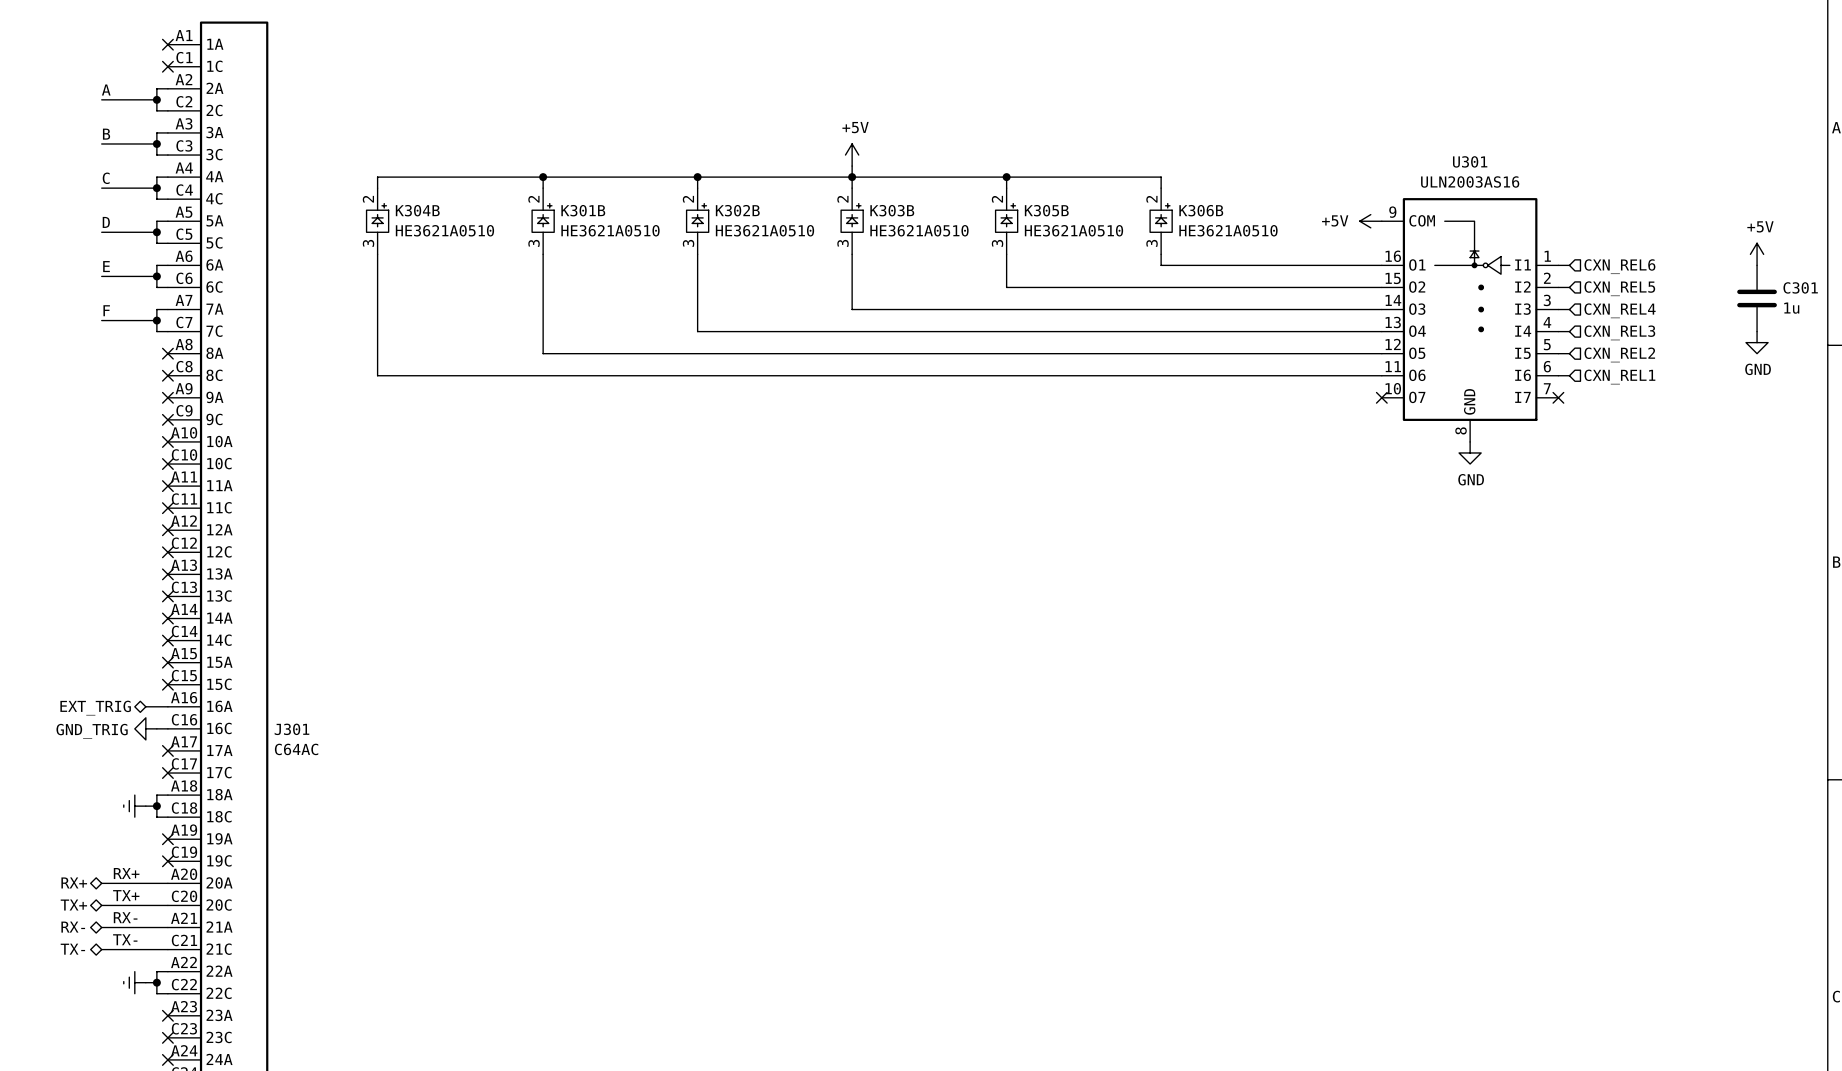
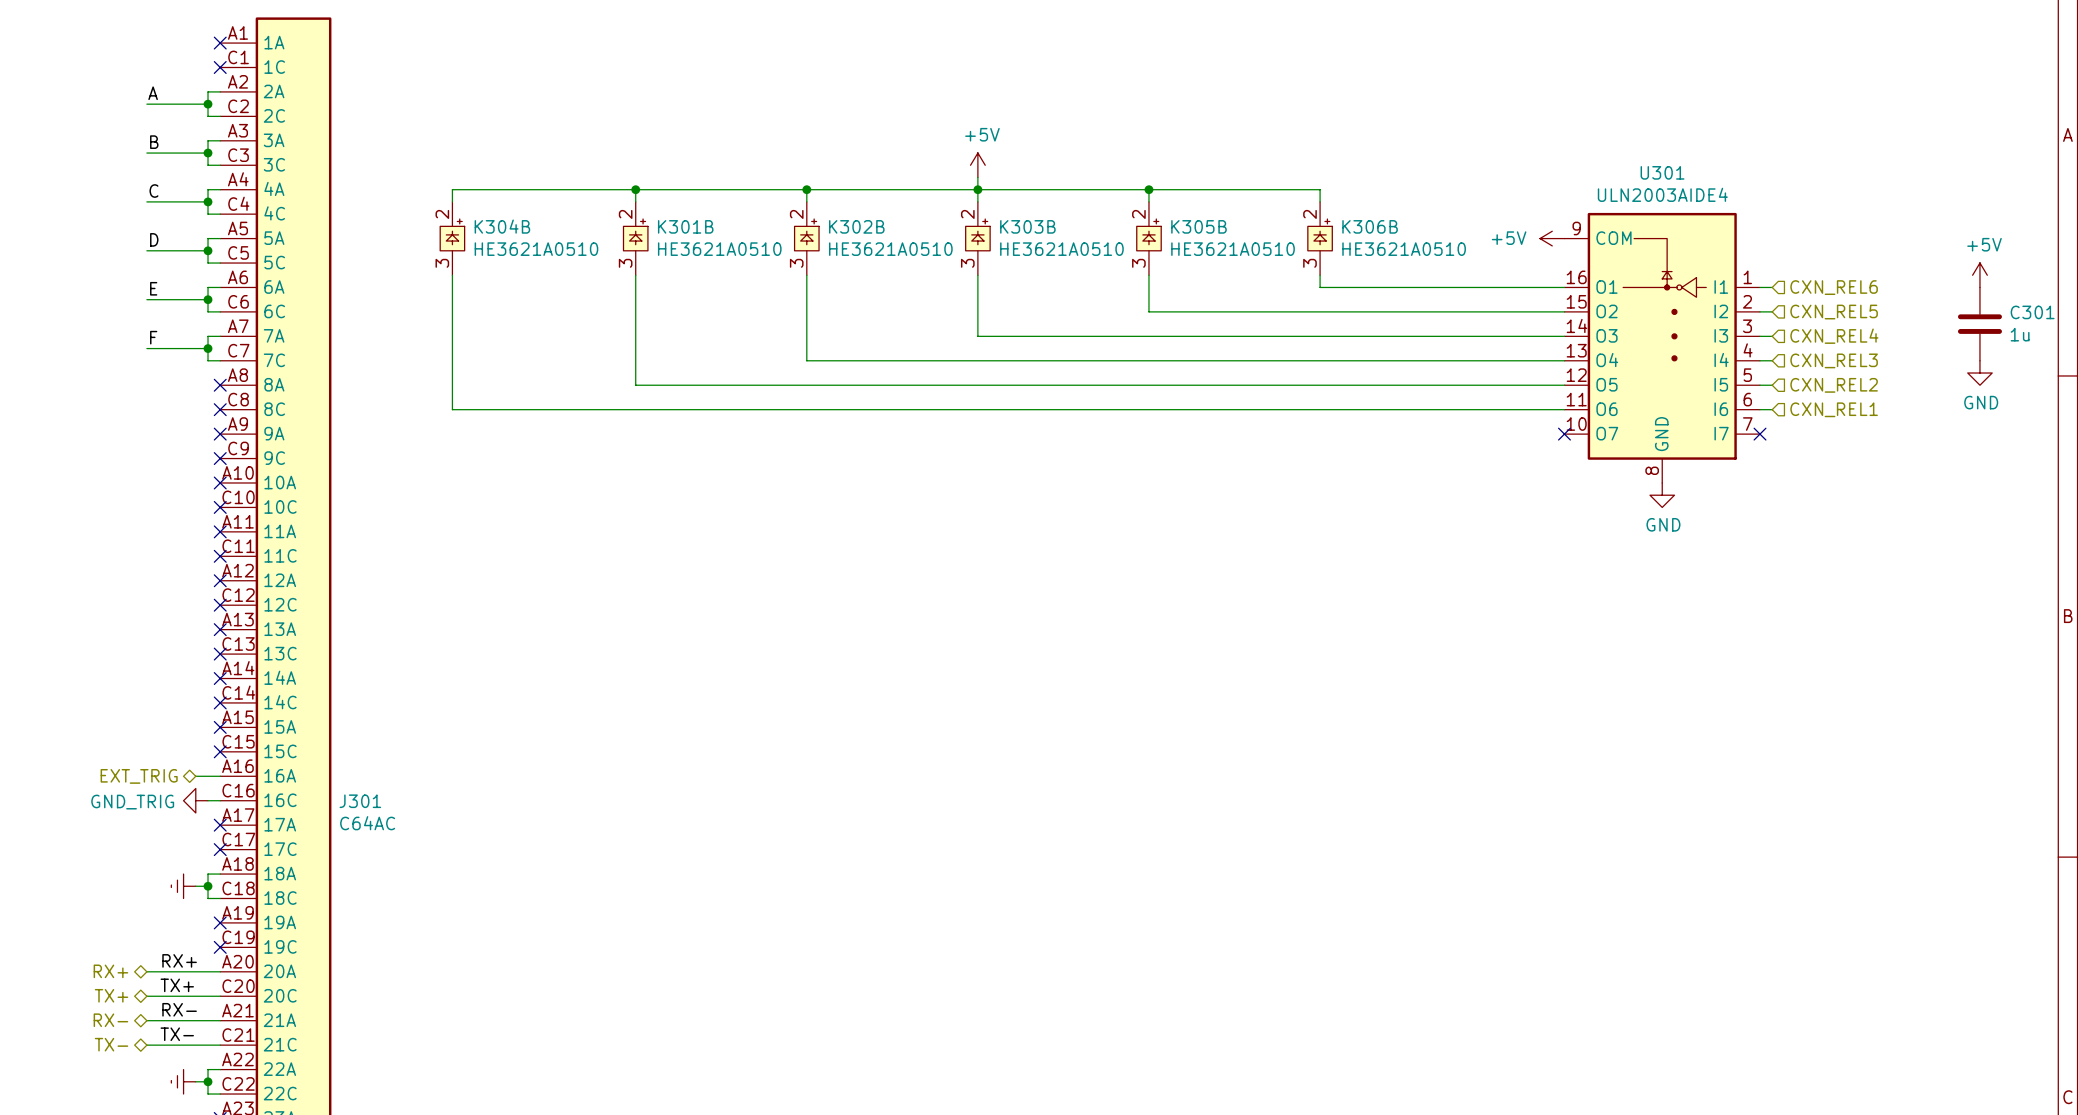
U301 value: ULN2003AS16 (1470, 181) -> ULN2003AIDE4 (1662, 194)

